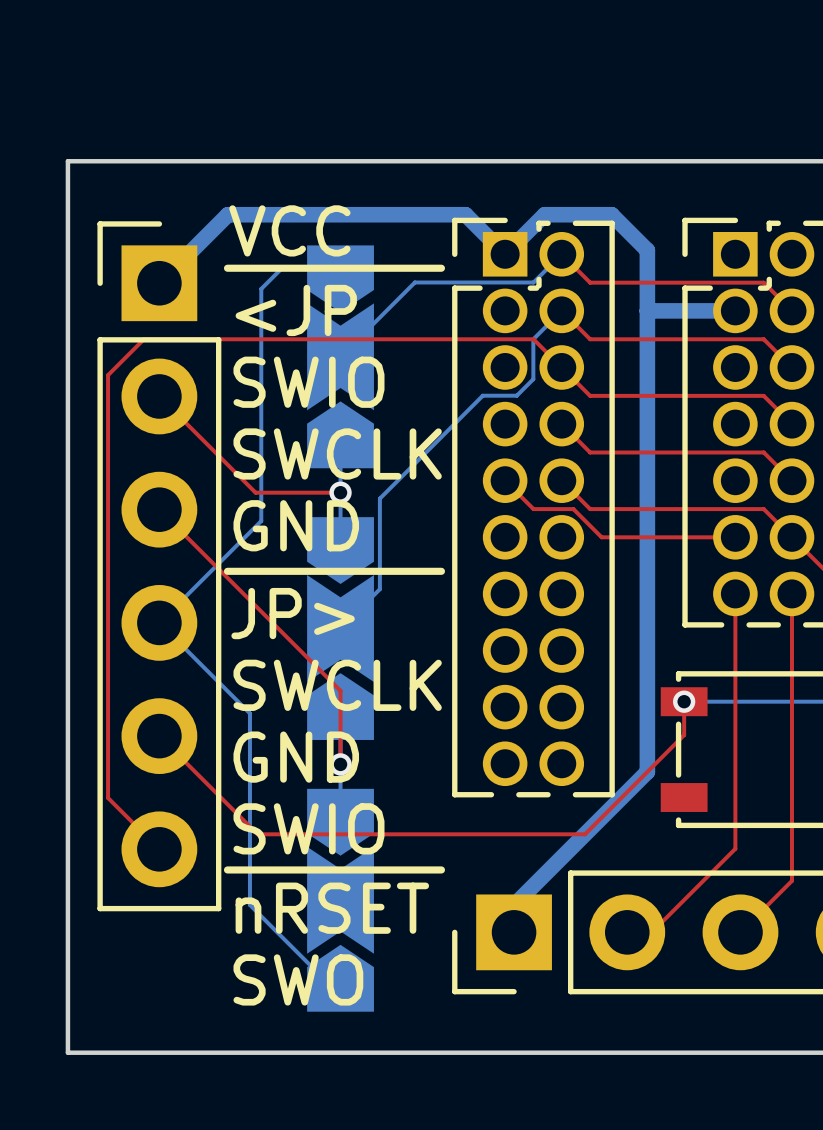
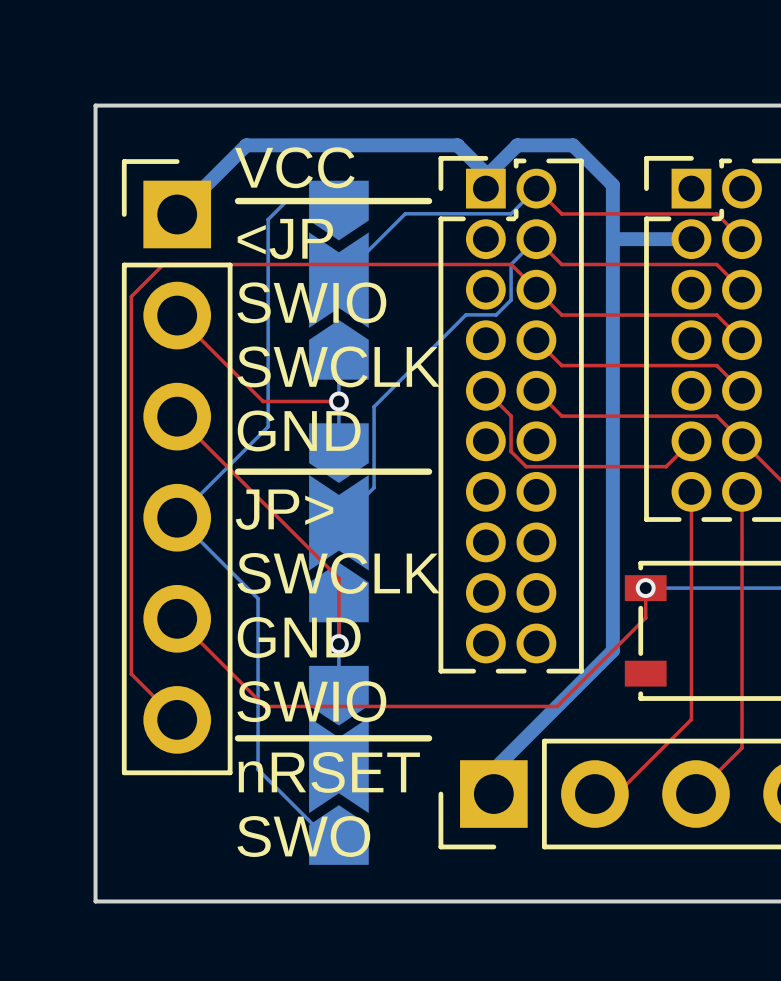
bottom track: (227, 214) (465, 214) (505, 254) (544, 214) (611, 214) -> (238, 153) (246, 145) (457, 145) (485, 173) (485, 188)
bottom track: none -> (581, 153) (573, 145) (517, 145) (485, 176)
top track: (533, 509) (573, 509) (601, 537) (735, 537) -> (511, 415) (511, 451) (526, 466) (666, 466) (691, 441)

